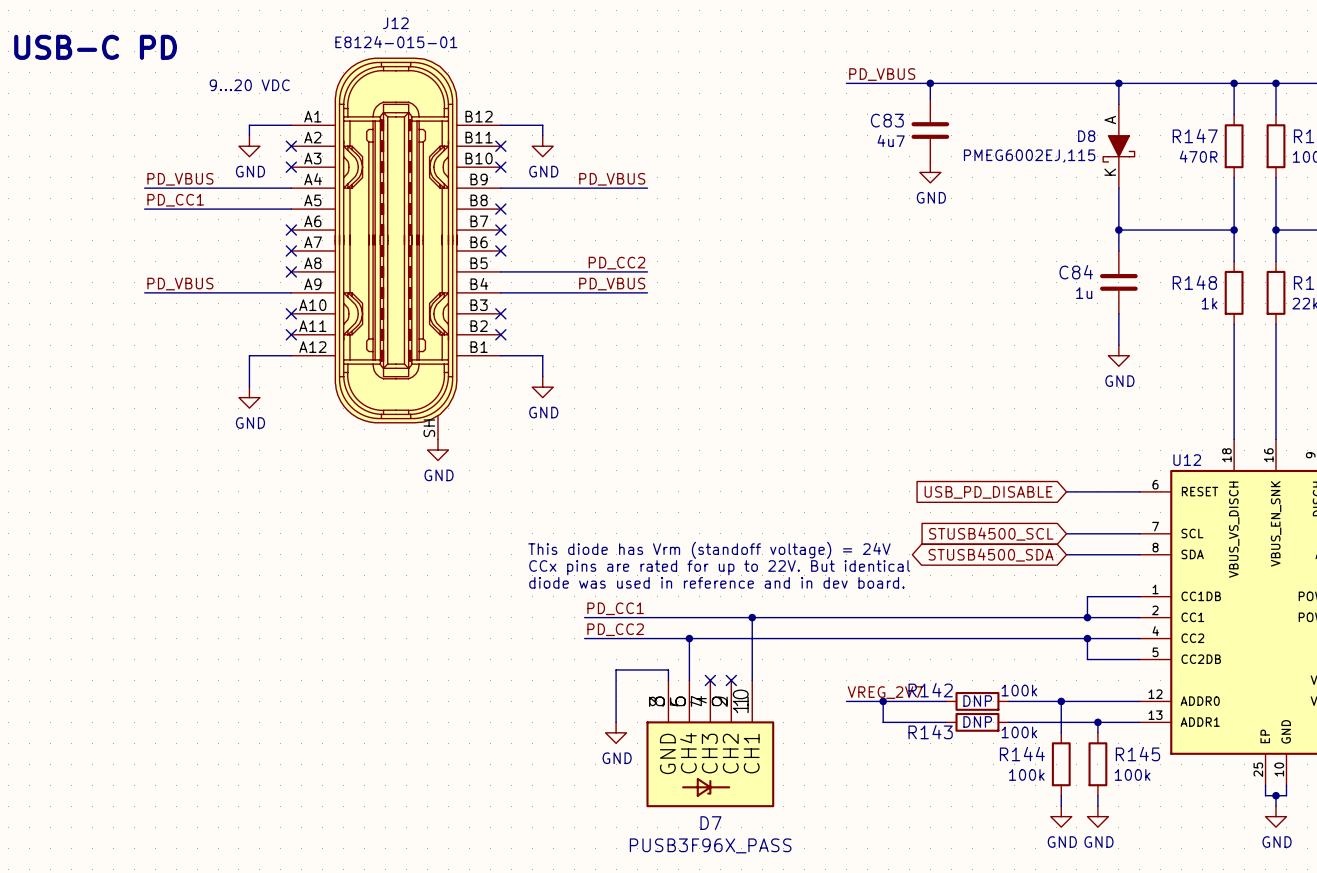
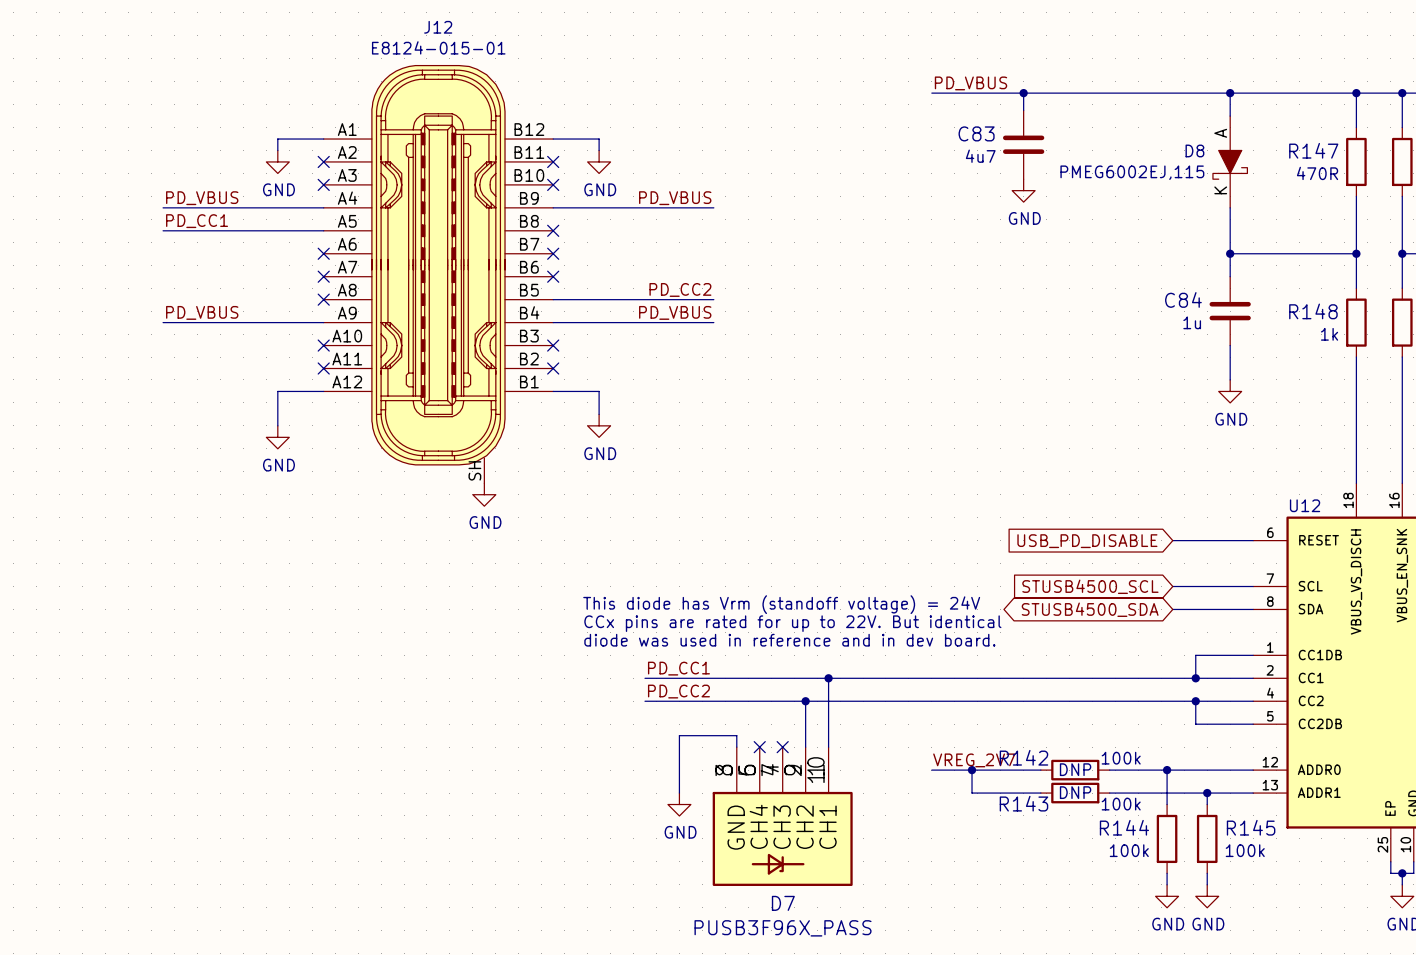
text: USB-C PD (95, 47) -> none
text: 9...20 VDC (249, 85) -> none
wire: (689, 638) (689, 680) -> (805, 701) (805, 747)
junction position: (689, 638) -> (805, 701)
no-connect mark position: (731, 680) -> (759, 747)

